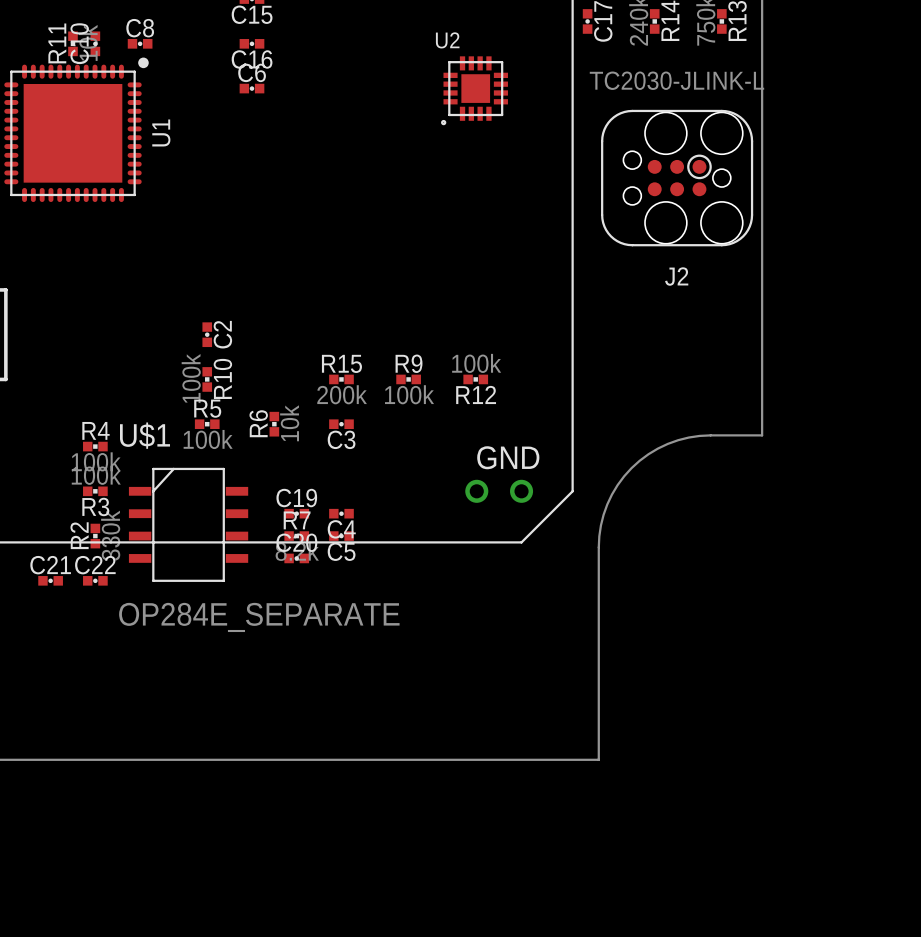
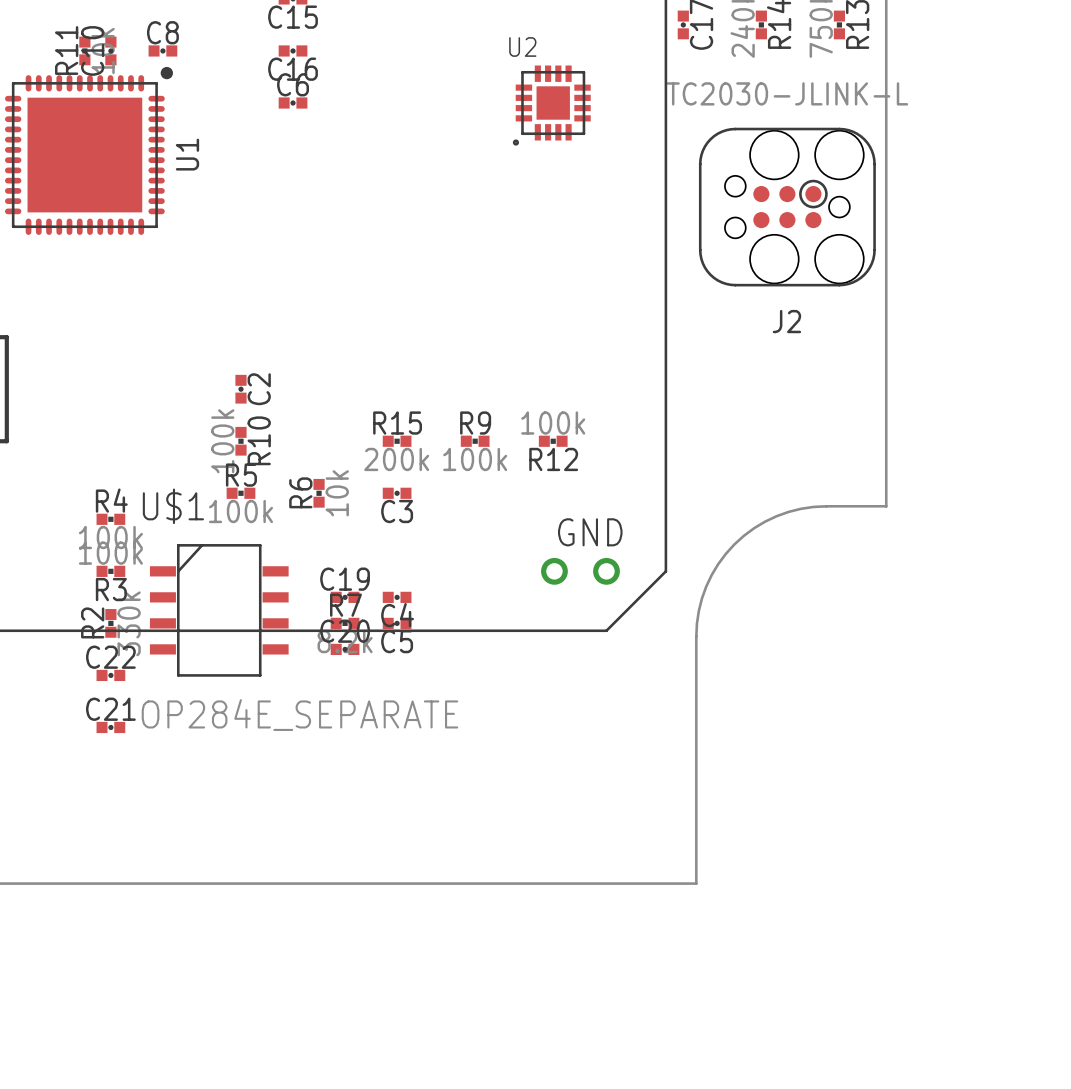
C21 position: (50, 580) -> (110, 727)

